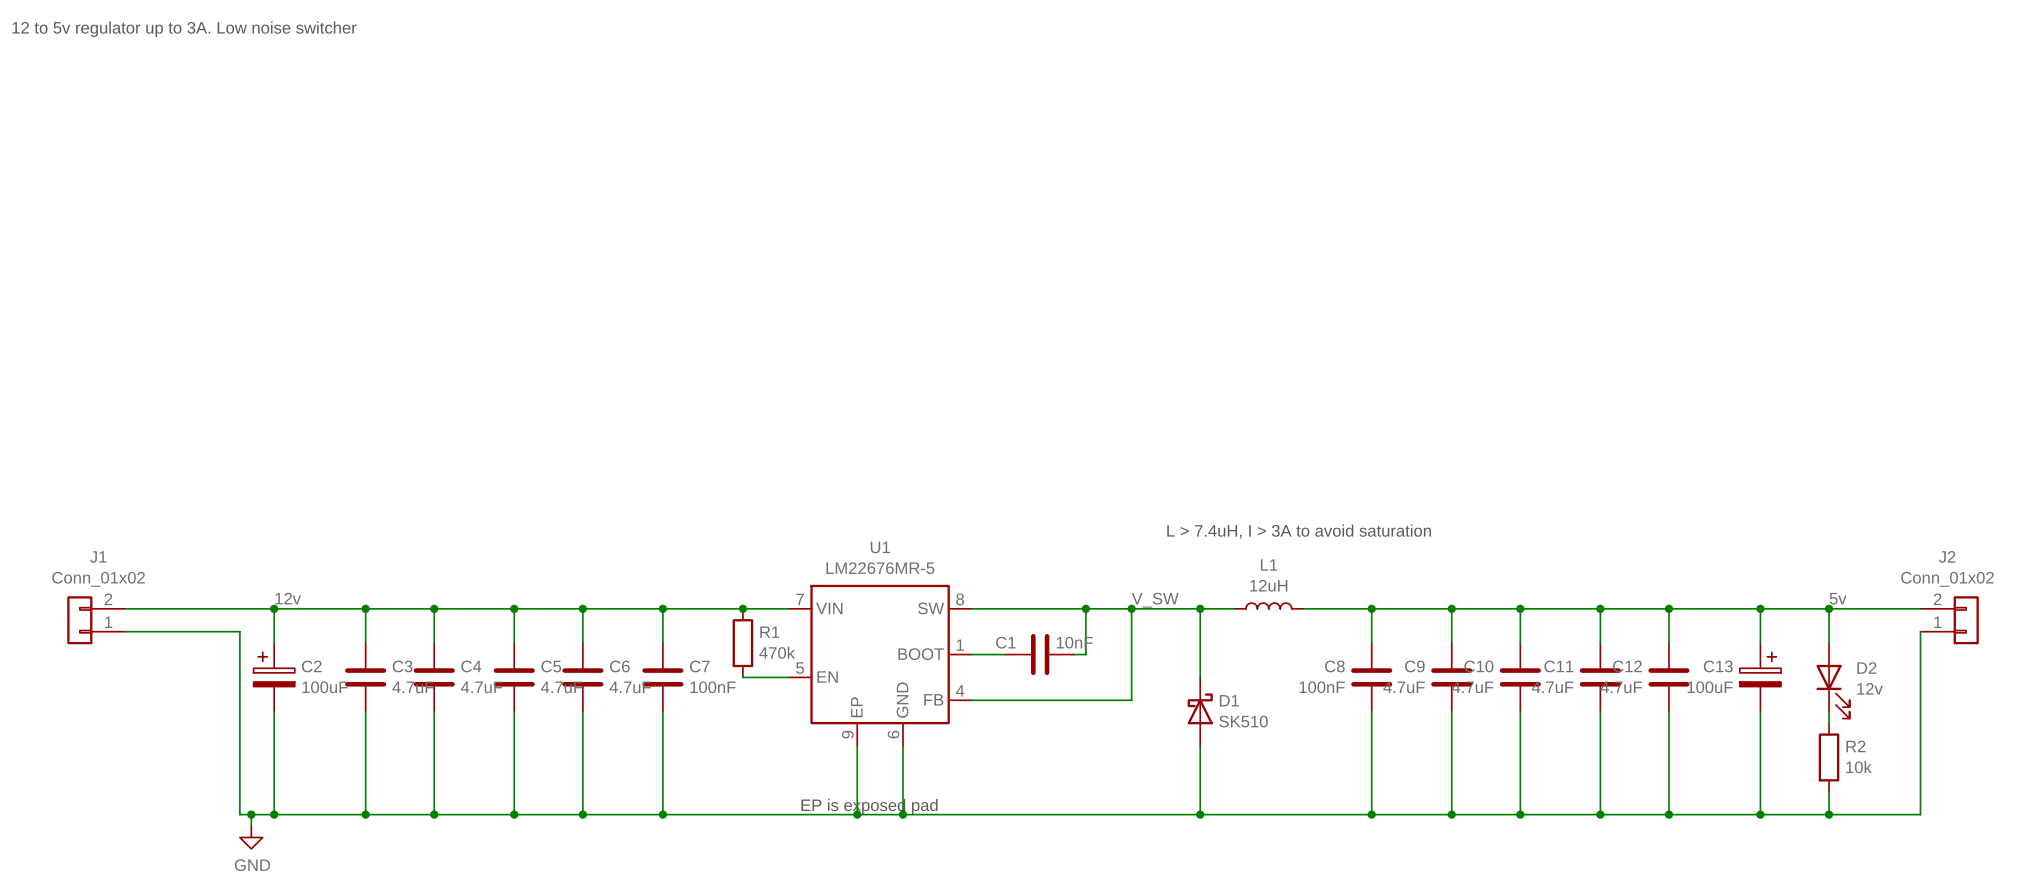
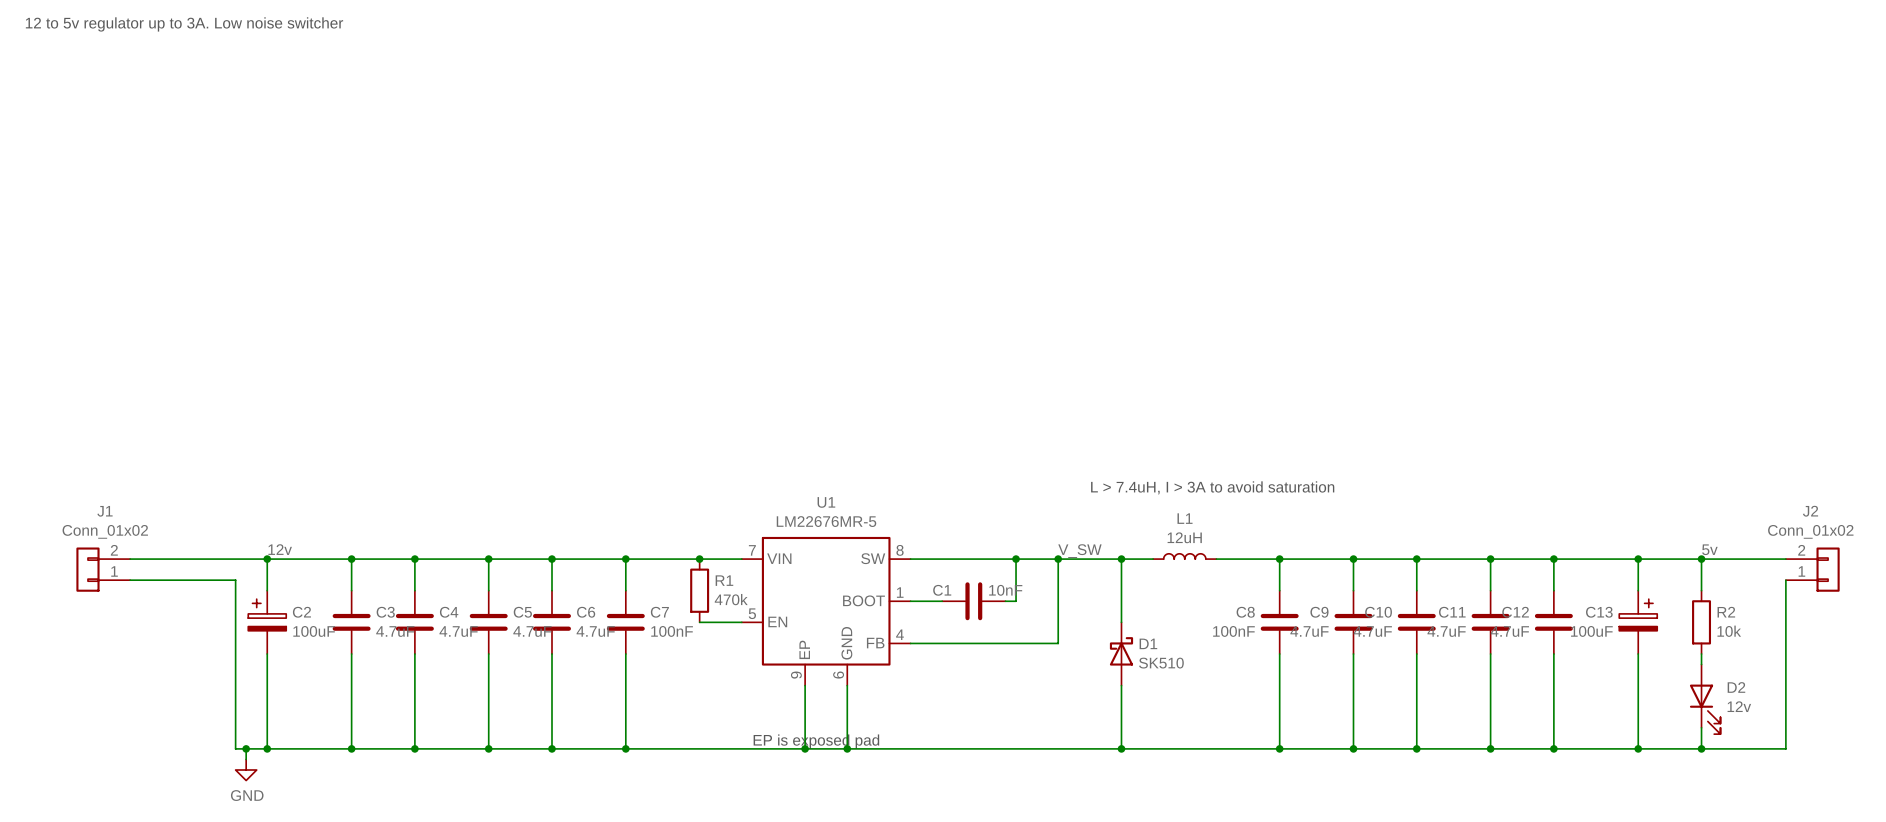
D2 position: (1833, 680) -> (1705, 699)
R2 position: (1829, 757) -> (1701, 622)

